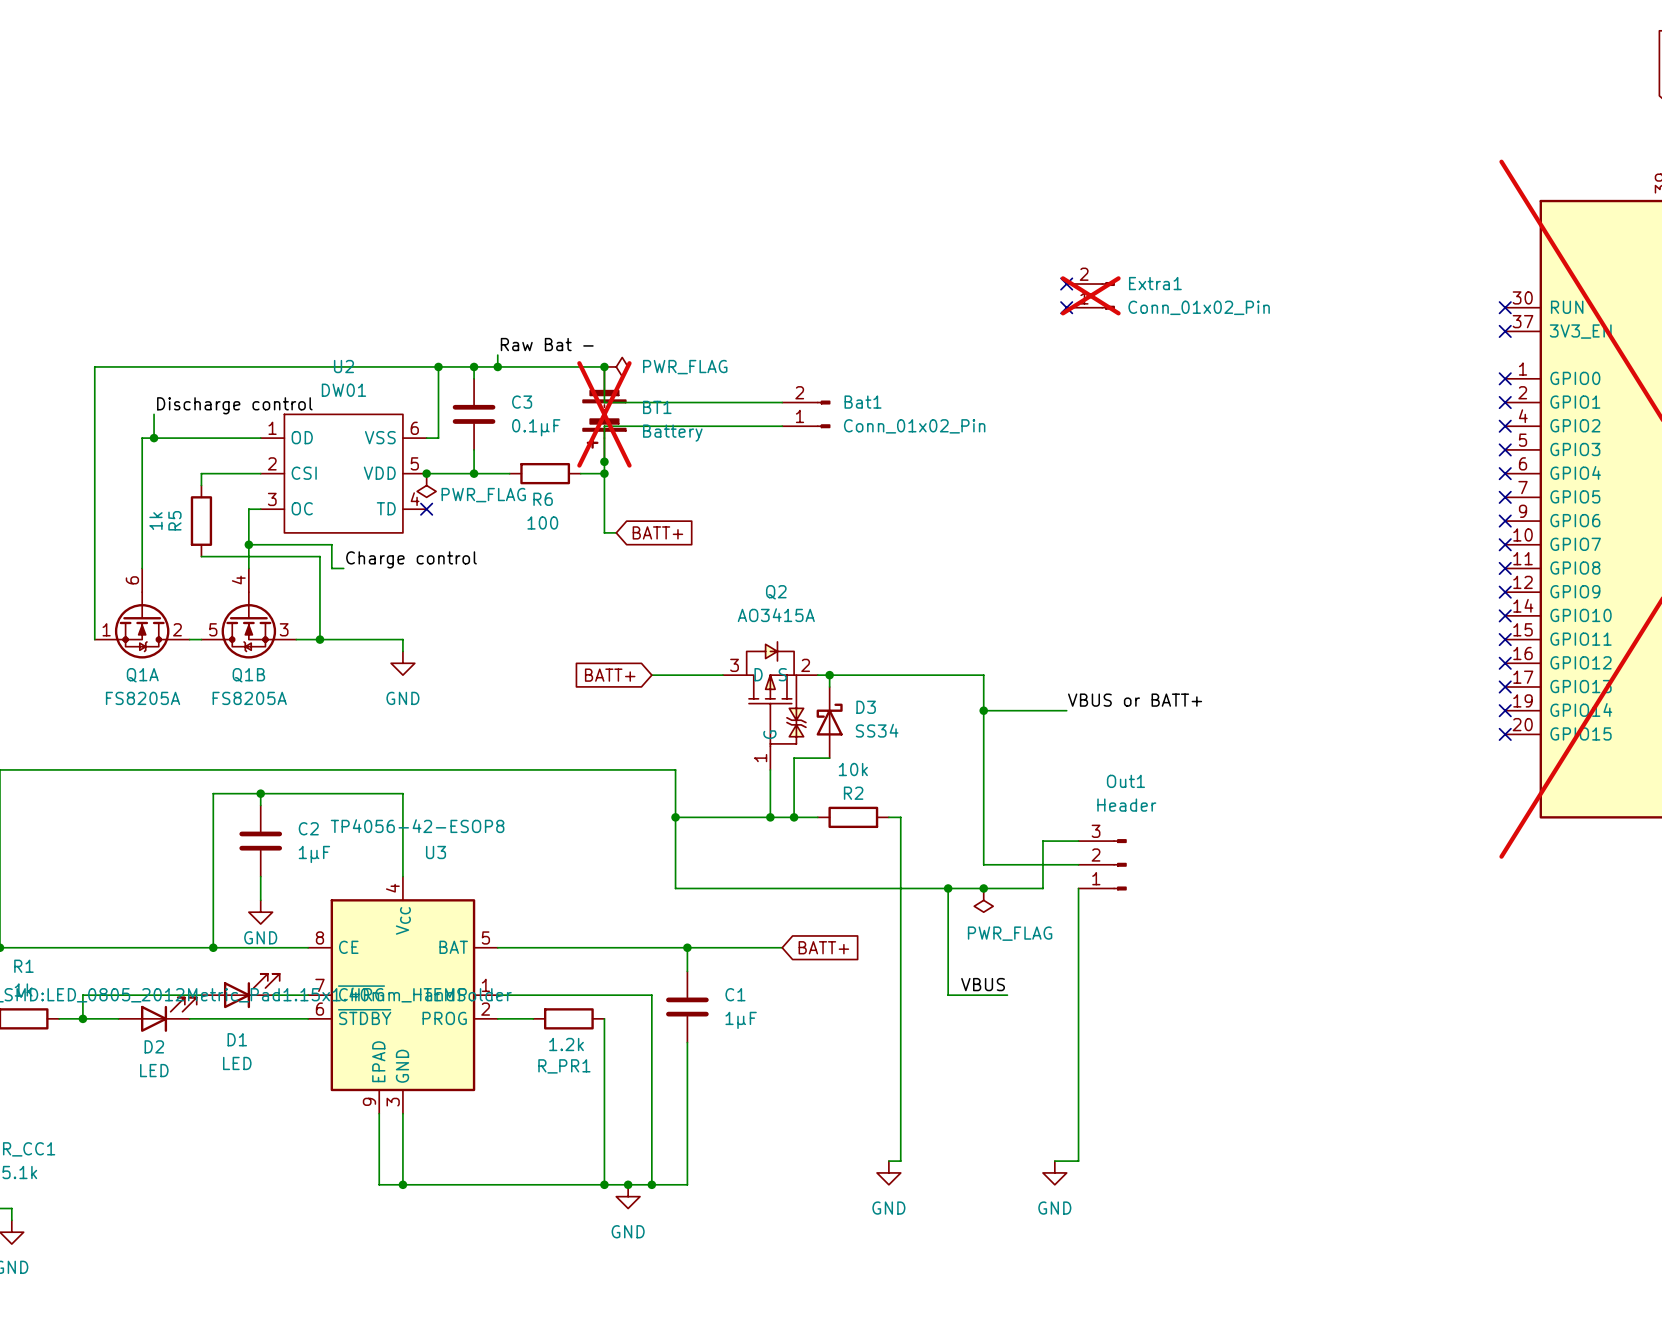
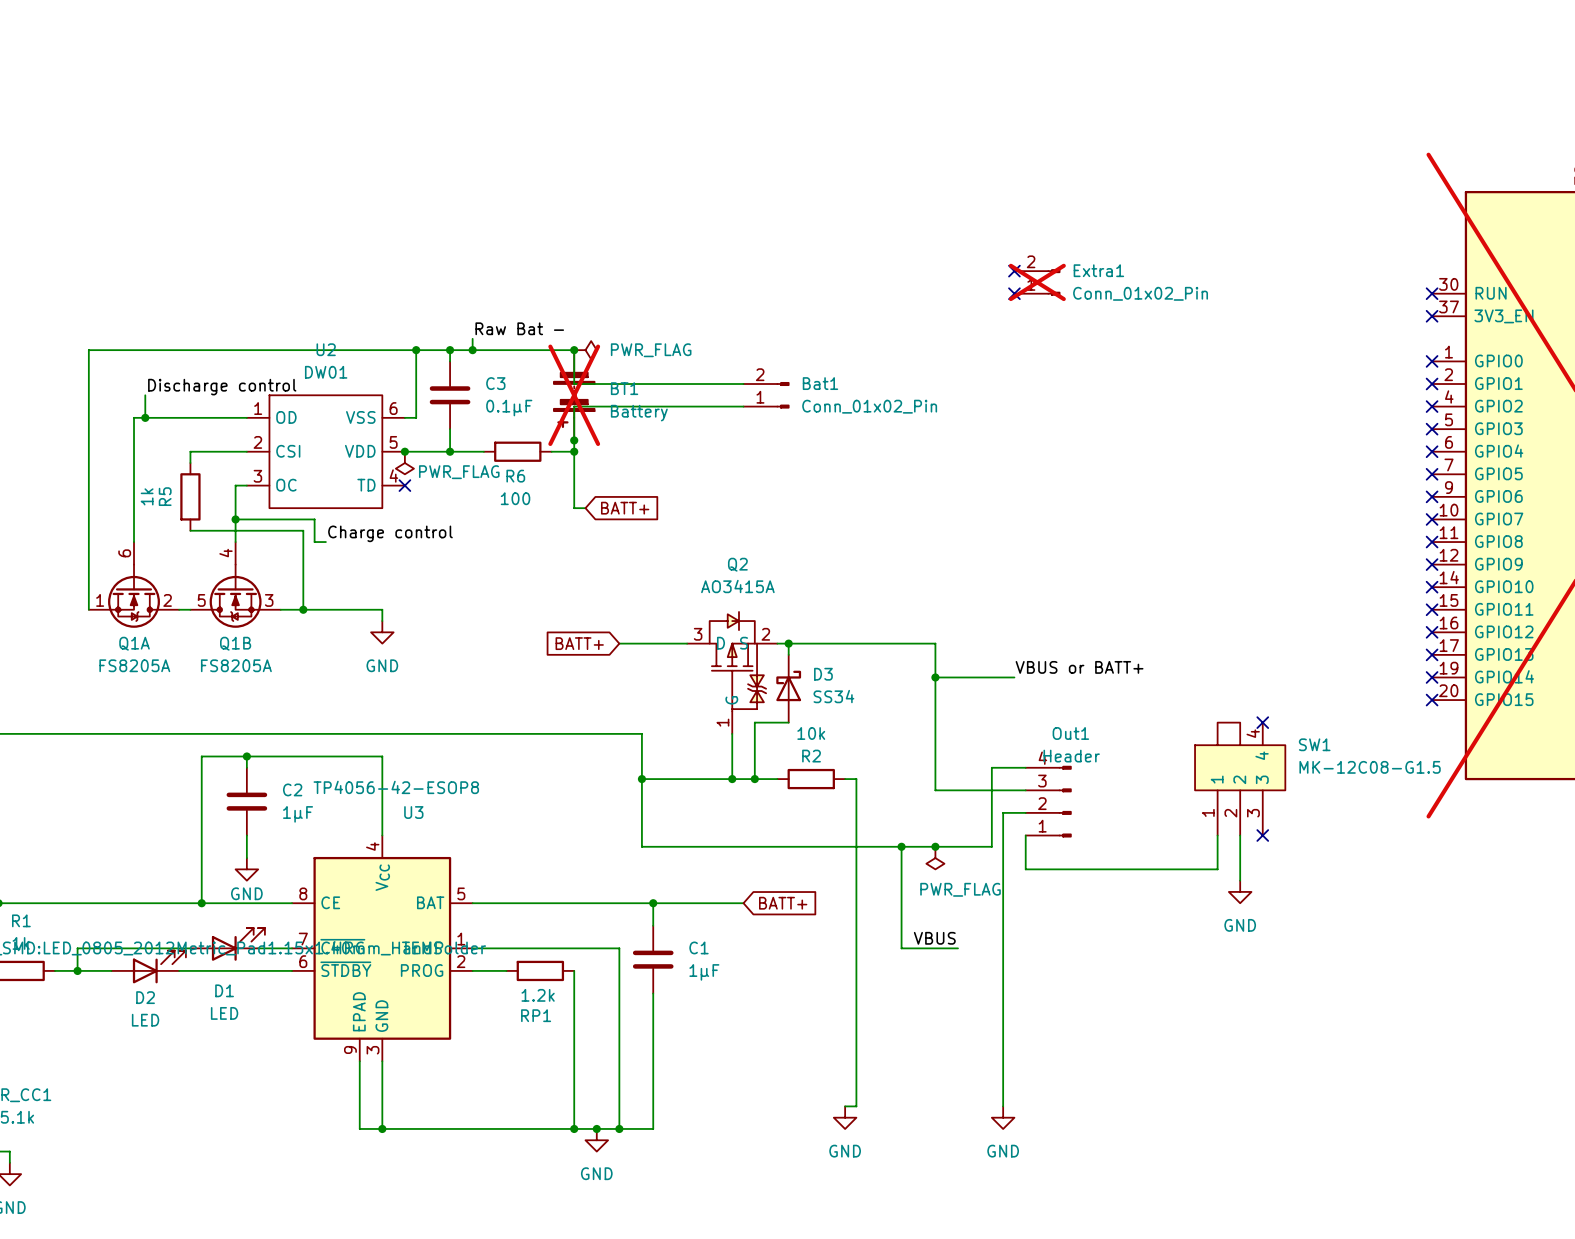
no-connect mark: none -> (1262, 722)
SW1: none -> MK-12C08-G1.5 (1240, 779)
wire: (983, 829) (983, 864) (1078, 864) -> (935, 790) (1025, 790)
Out1 symbol: [1078, 839, 1127, 891] -> [1025, 765, 1072, 838]
wire: (1042, 841) (1078, 841) -> (991, 801) (991, 767) (1025, 767)
wire: none -> (1025, 835) (1025, 846)
wire: none -> (1217, 835) (1217, 869) (1025, 869)
wire: none -> (1240, 835) (1240, 880)
no-connect mark: none -> (1262, 835)
wire: (1078, 912) (1078, 1161) (1054, 1161) -> (1025, 812) (1003, 812) (1003, 1106)
power symbol: none -> GND (1240, 891)
R_PR1 name: R_PR1 (564, 1066) -> RP1 (536, 1015)

